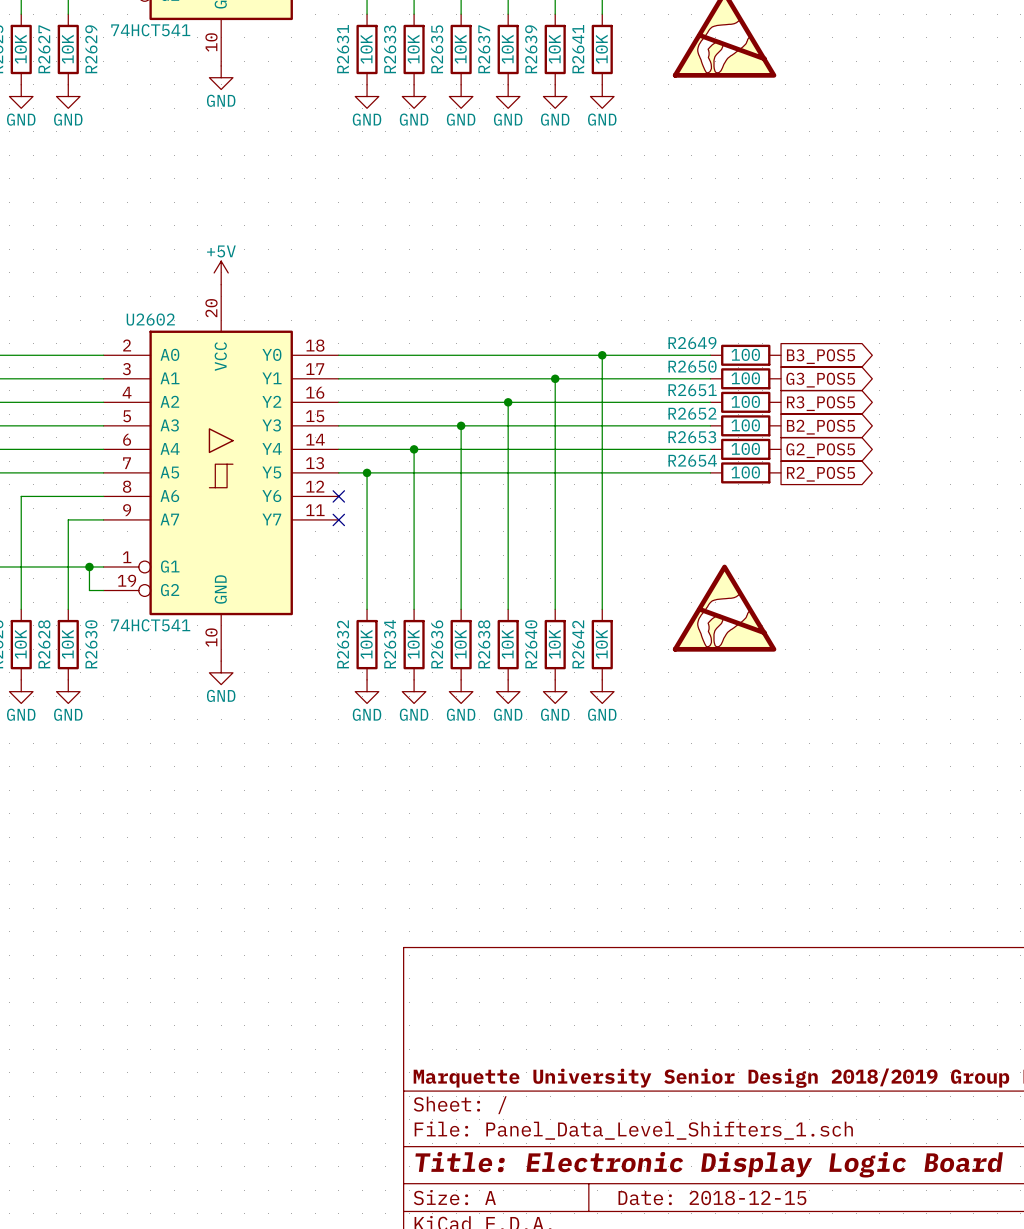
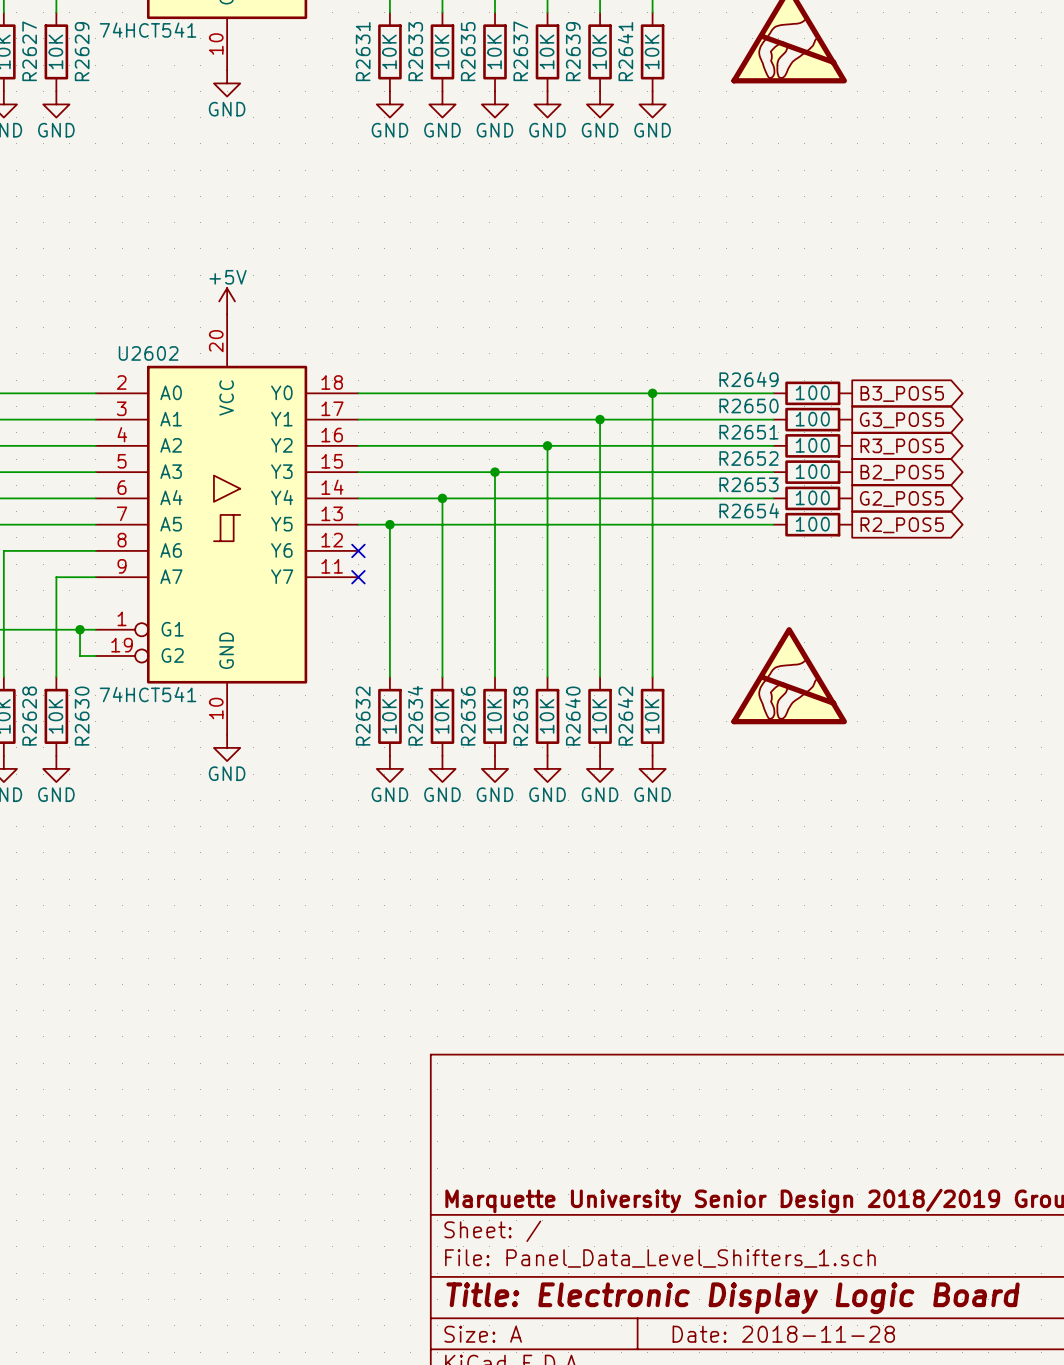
title block: Date: 2018-12-15 (712, 1197) -> Date: 2018-11-28 (783, 1334)

